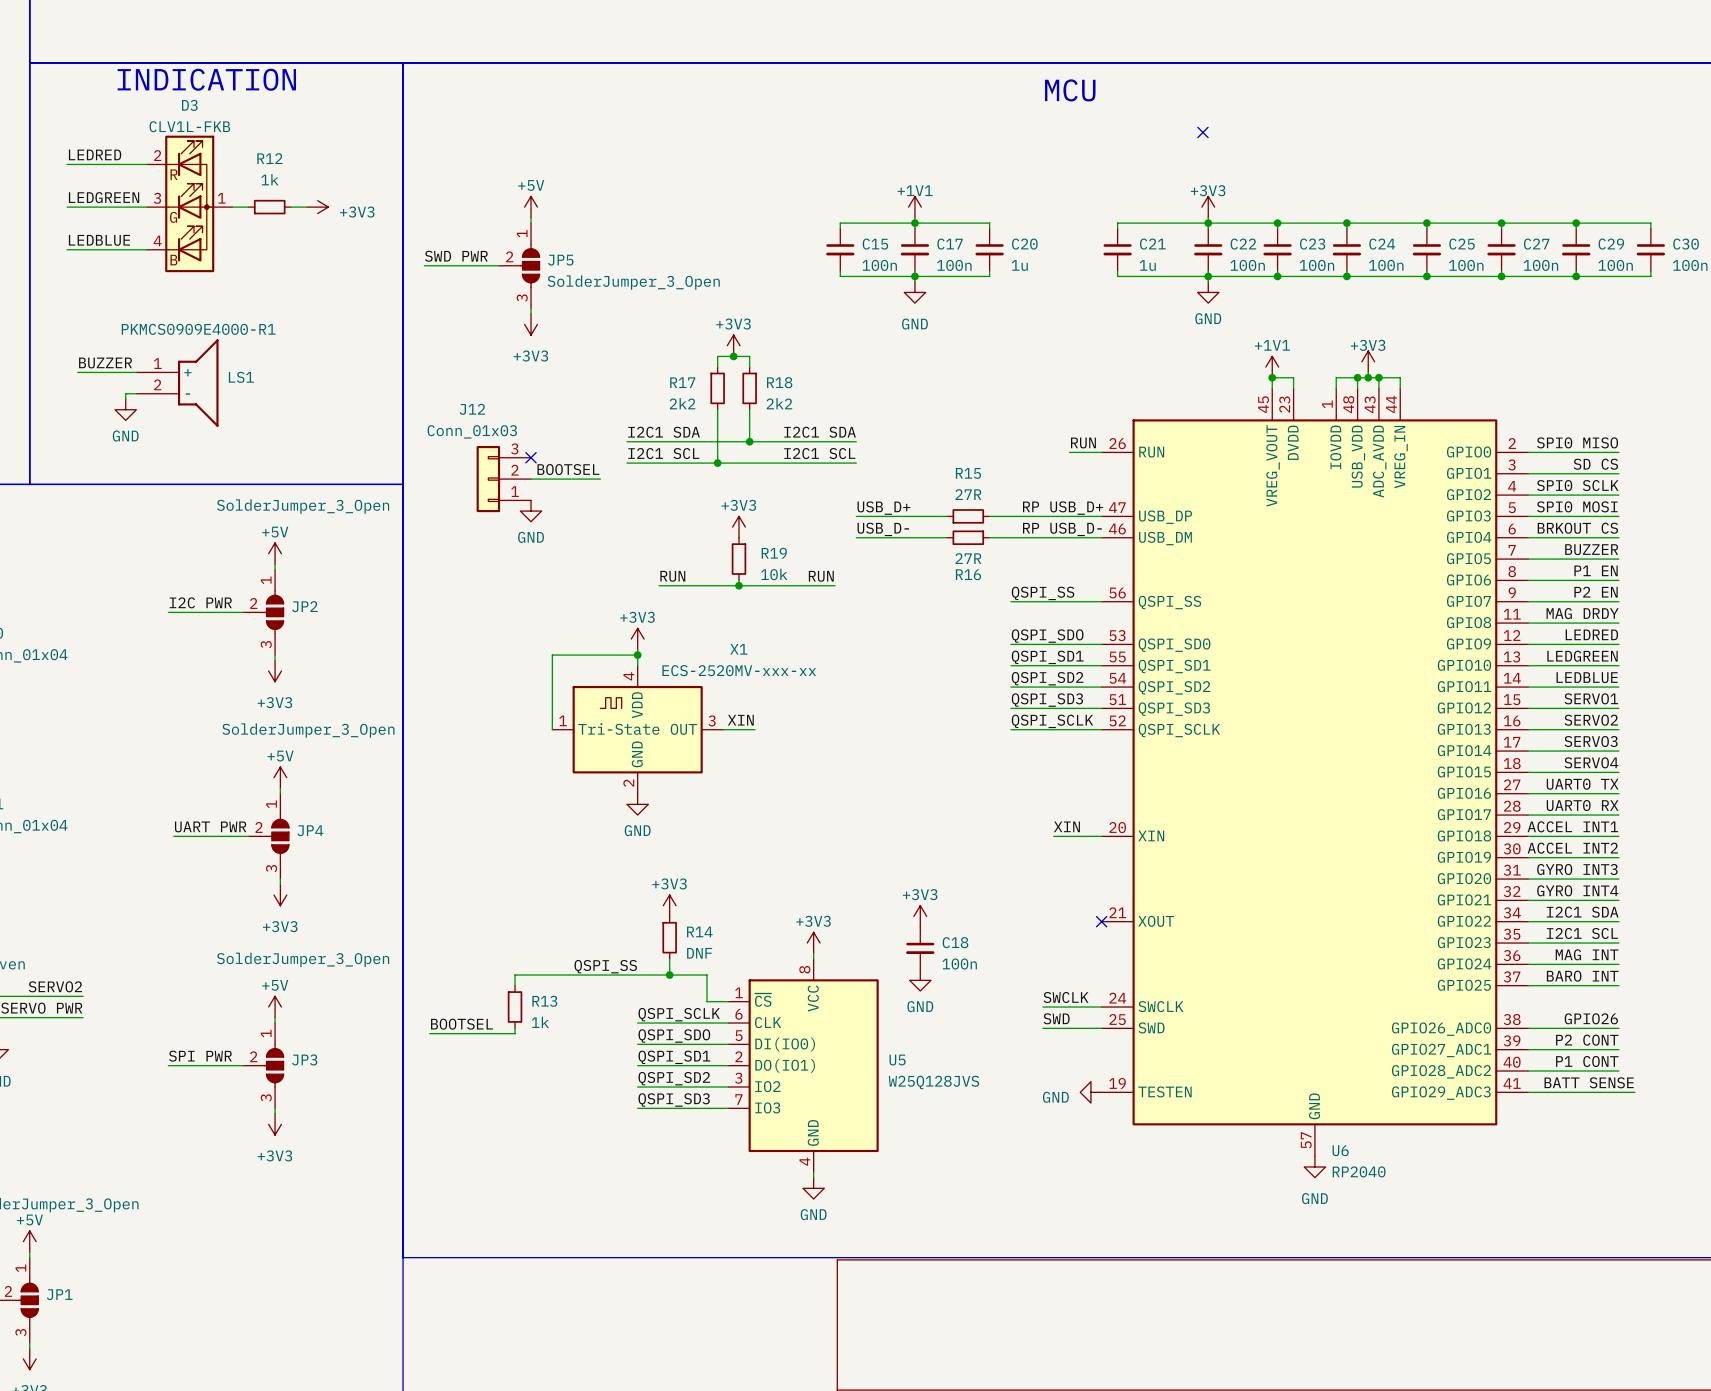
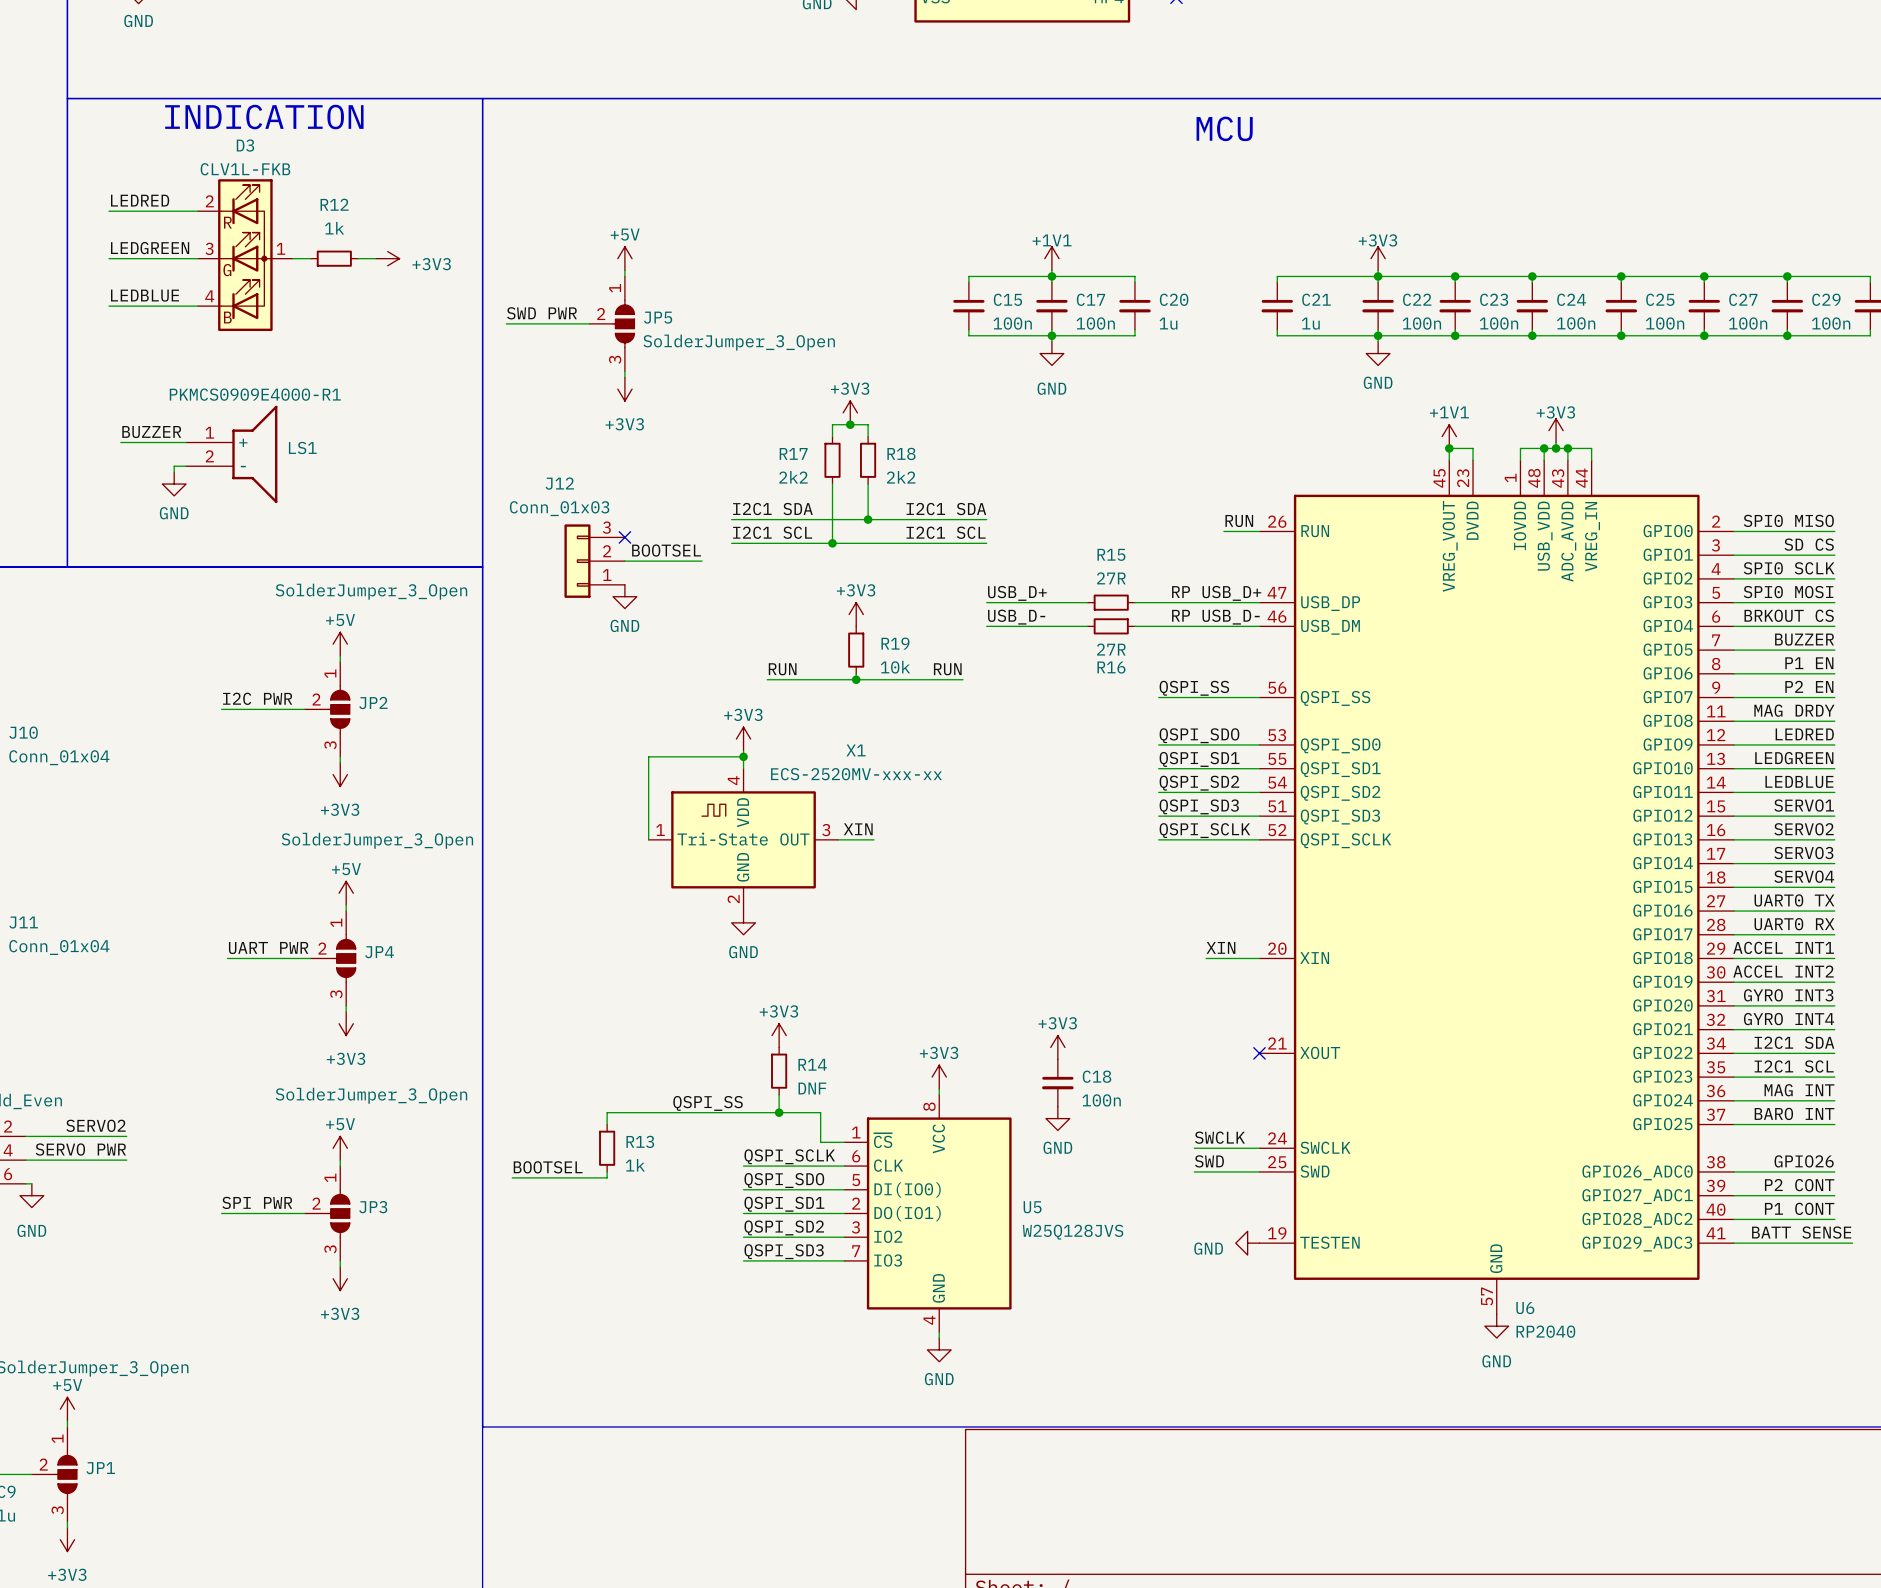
no-connect mark: (1202, 132) -> none

